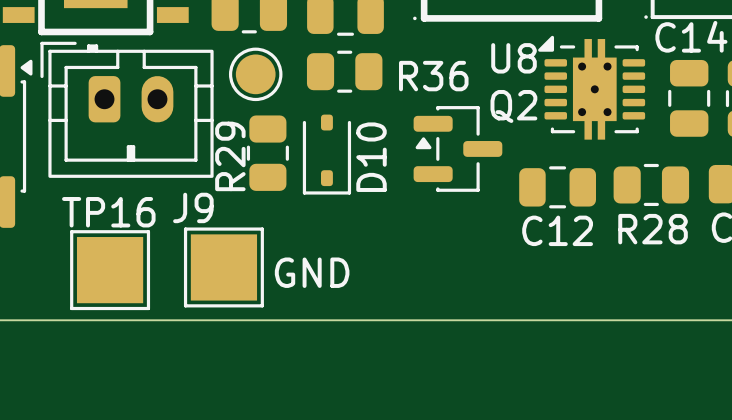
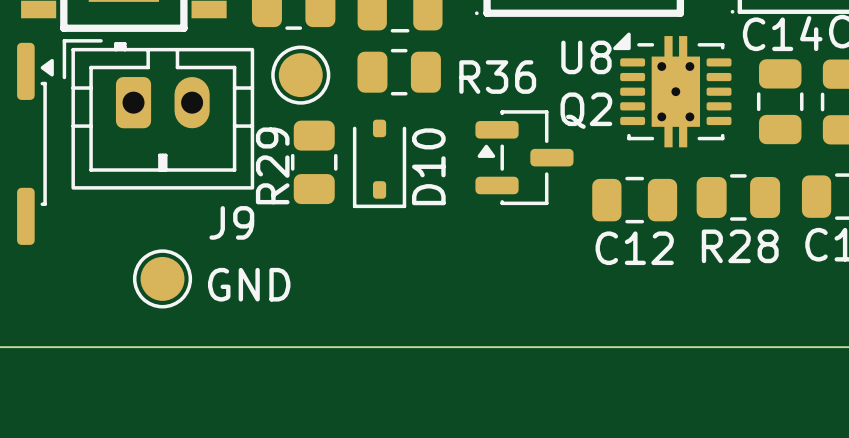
part: none -> GND (162, 278)
part: GND (223, 267) -> none
TP16: (110, 270) -> none

